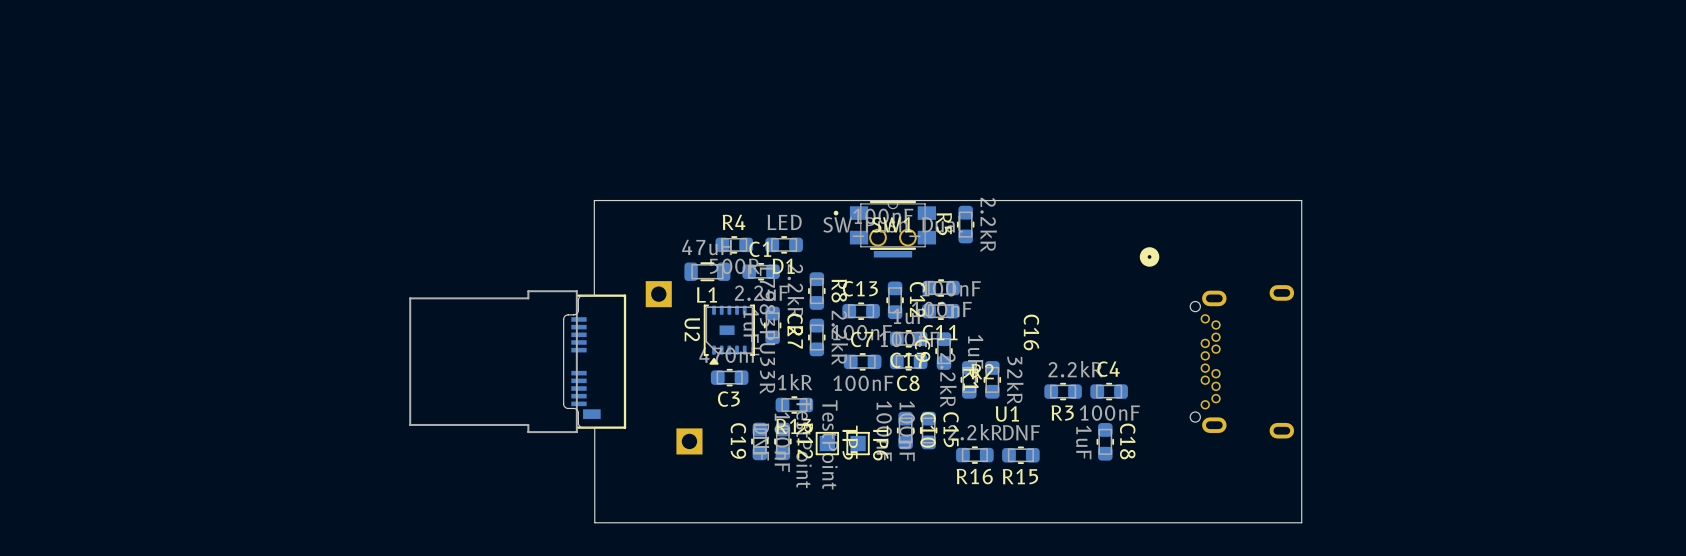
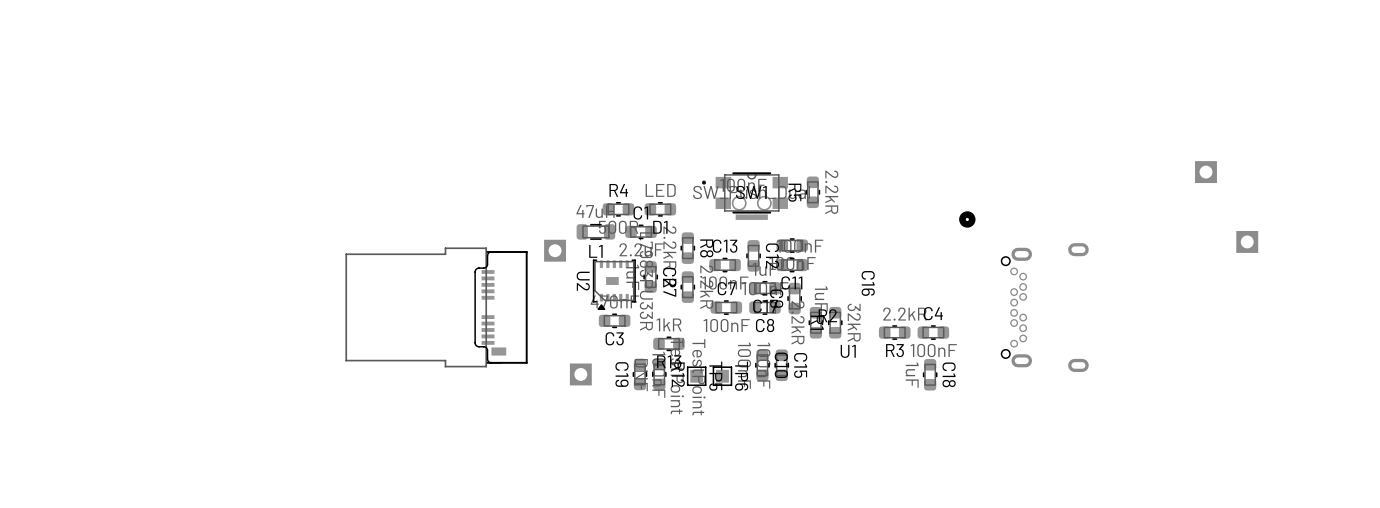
part: none -> (1205, 172)
part: none -> (1247, 241)
board edge: (594, 295) (594, 200) (1301, 200) (1301, 522) (594, 522) (594, 427) -> none
R16: 2.2kR (974, 455) -> none
R15: DNF (1020, 455) -> none

